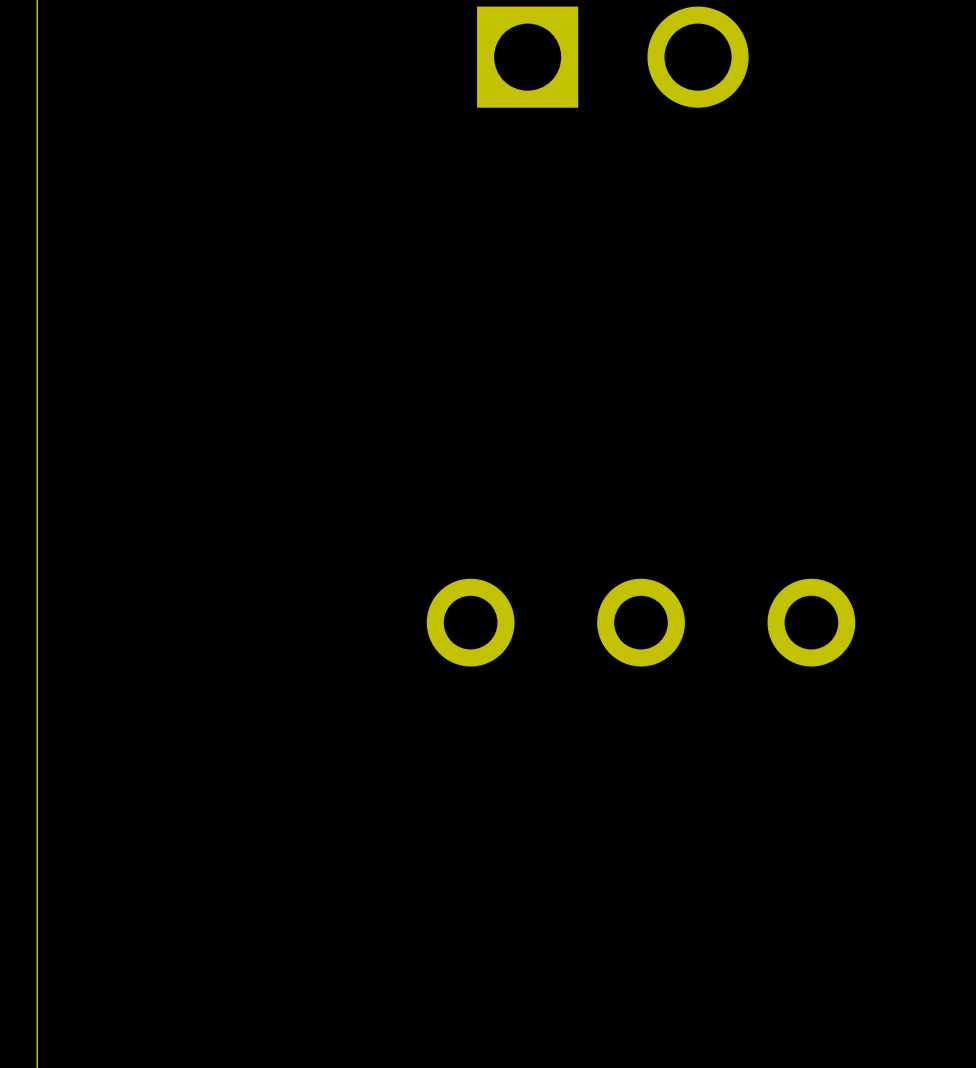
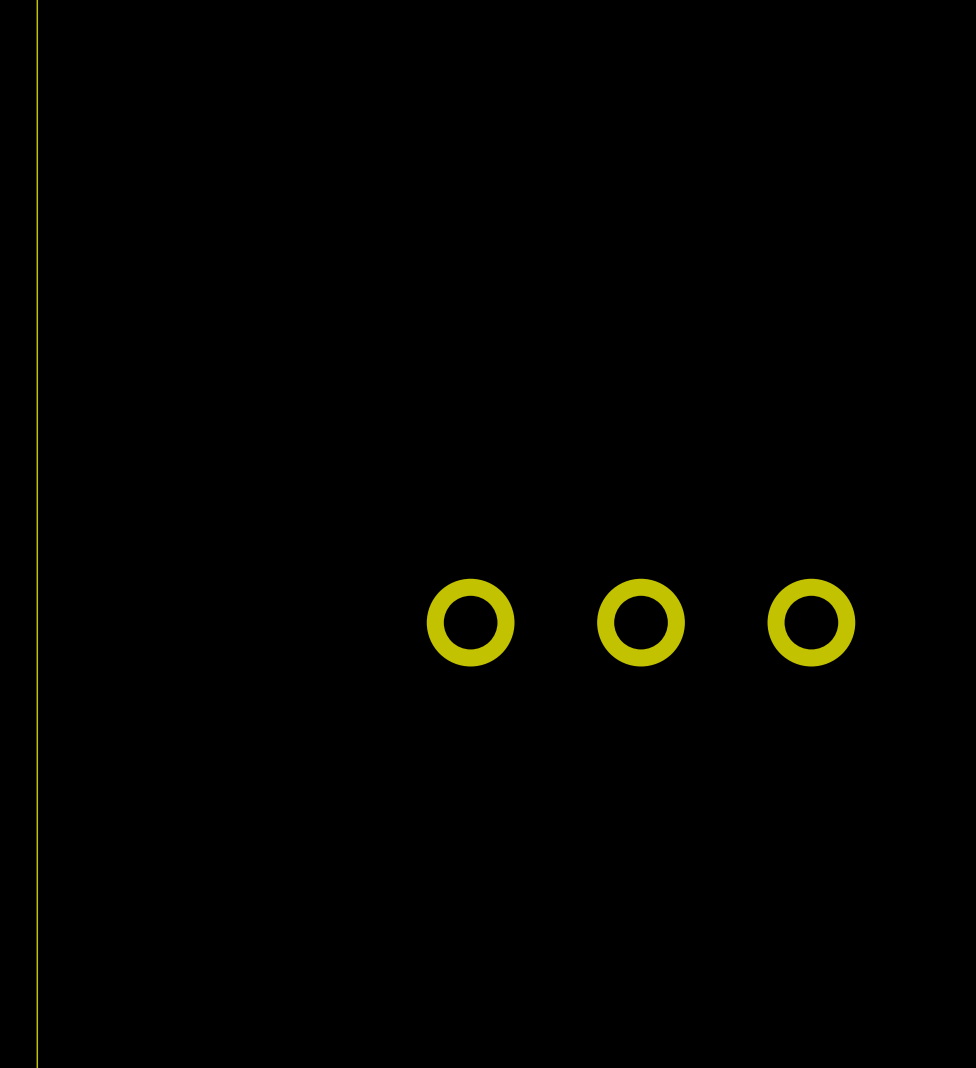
part: (612, 57) -> none

